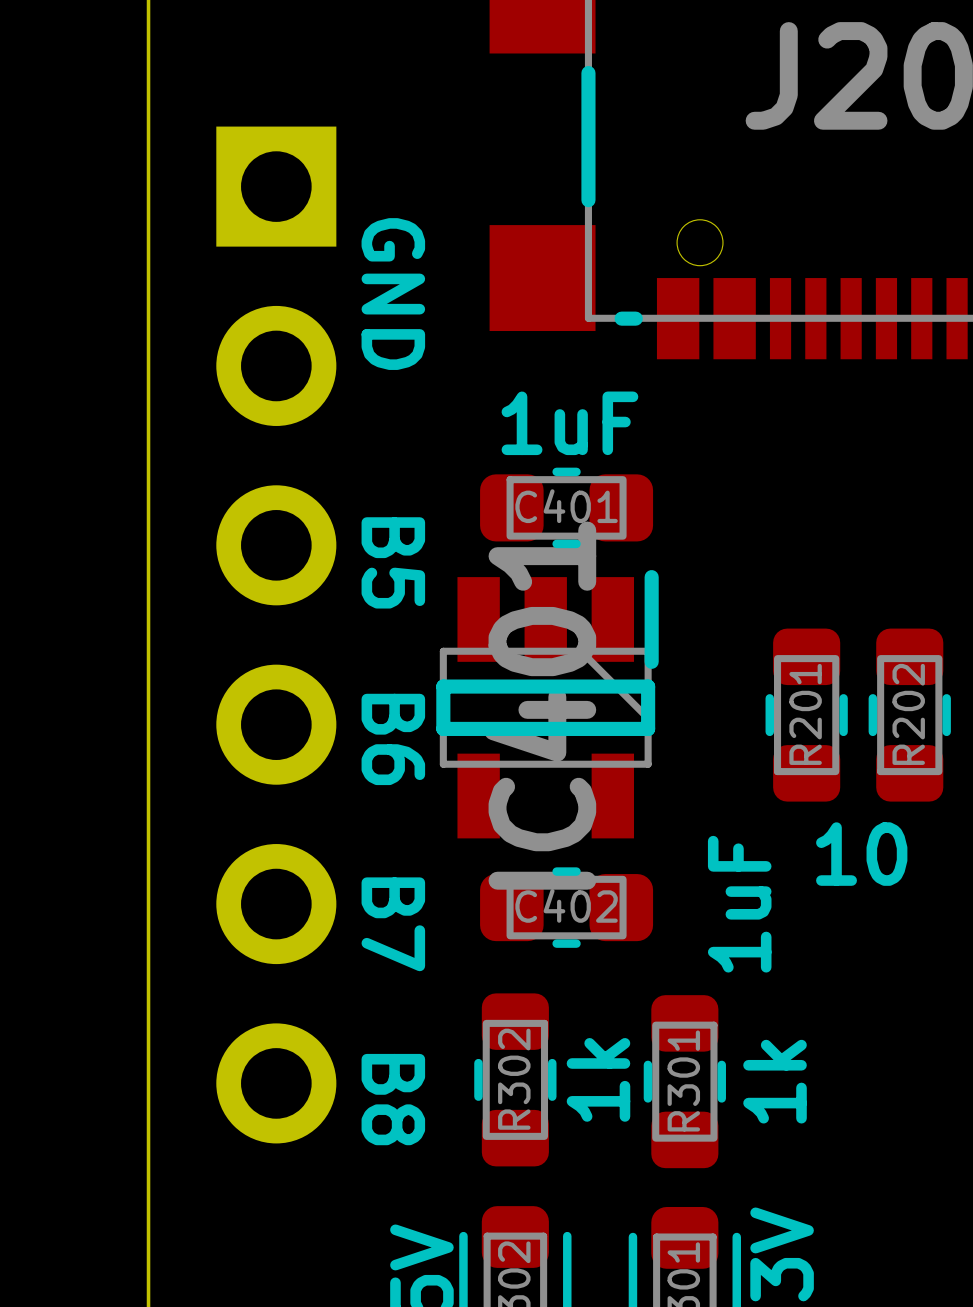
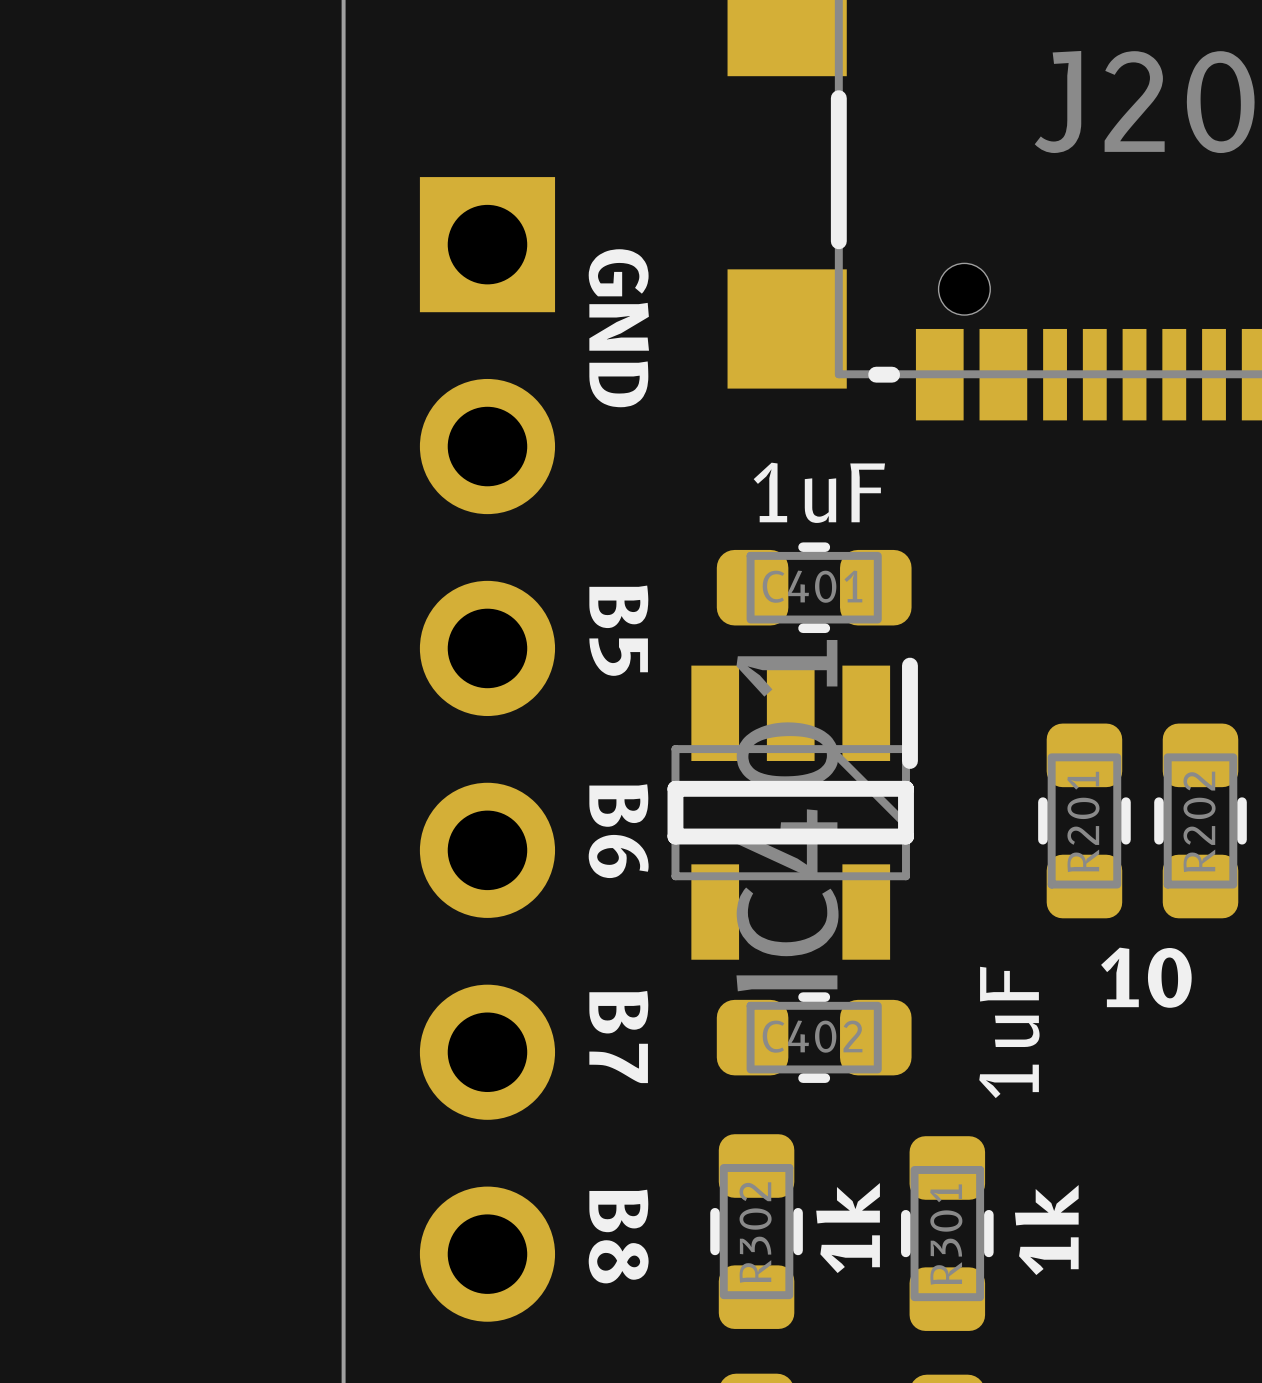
part position: (276, 635) -> (487, 749)

